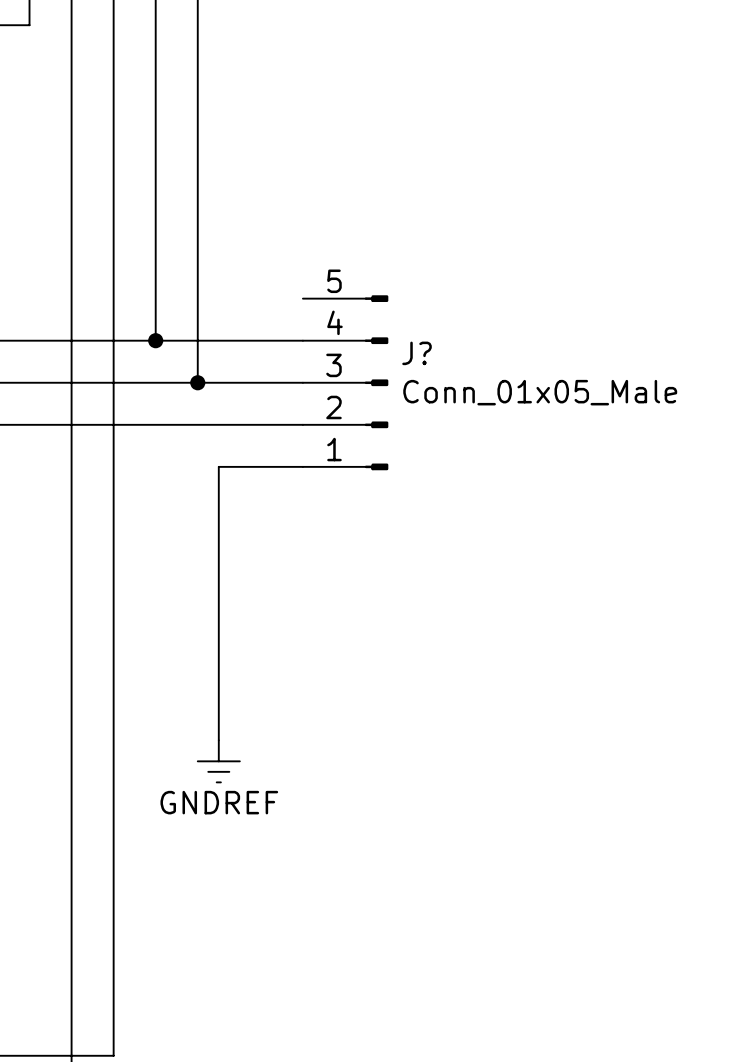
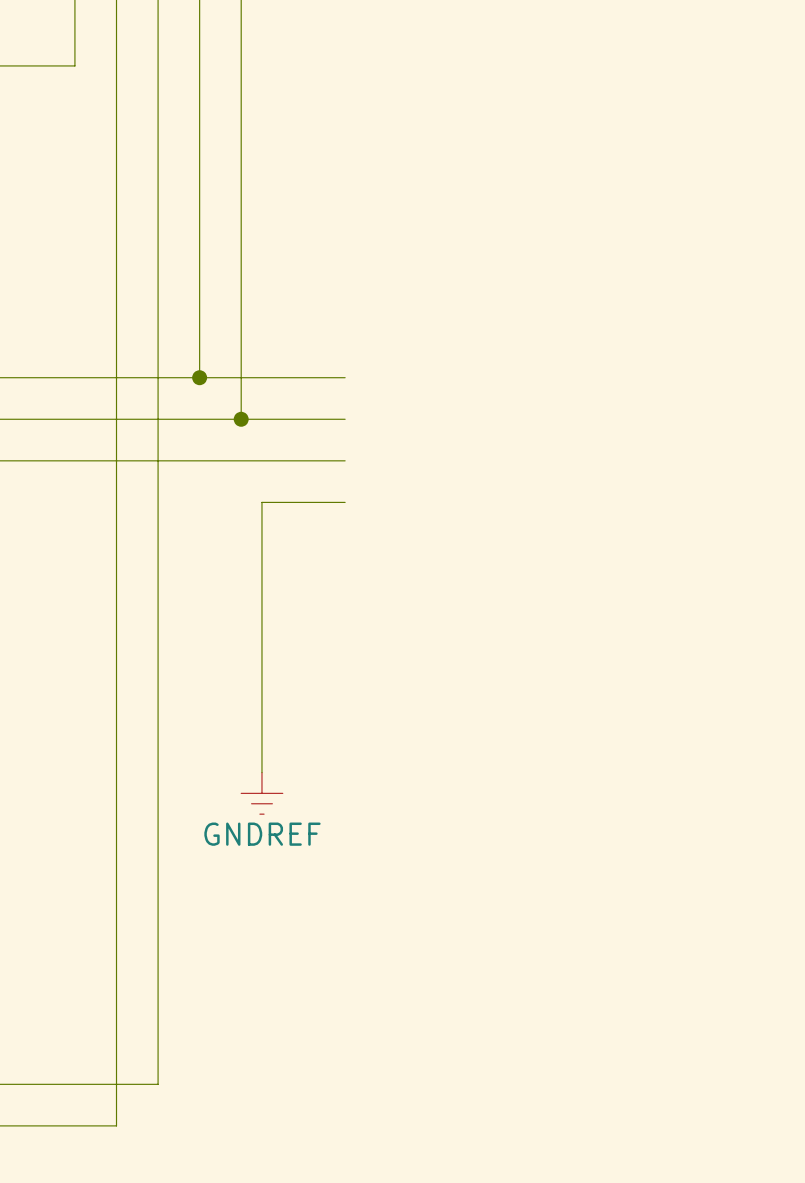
J?: Conn_01x05_Male (345, 382) -> none

